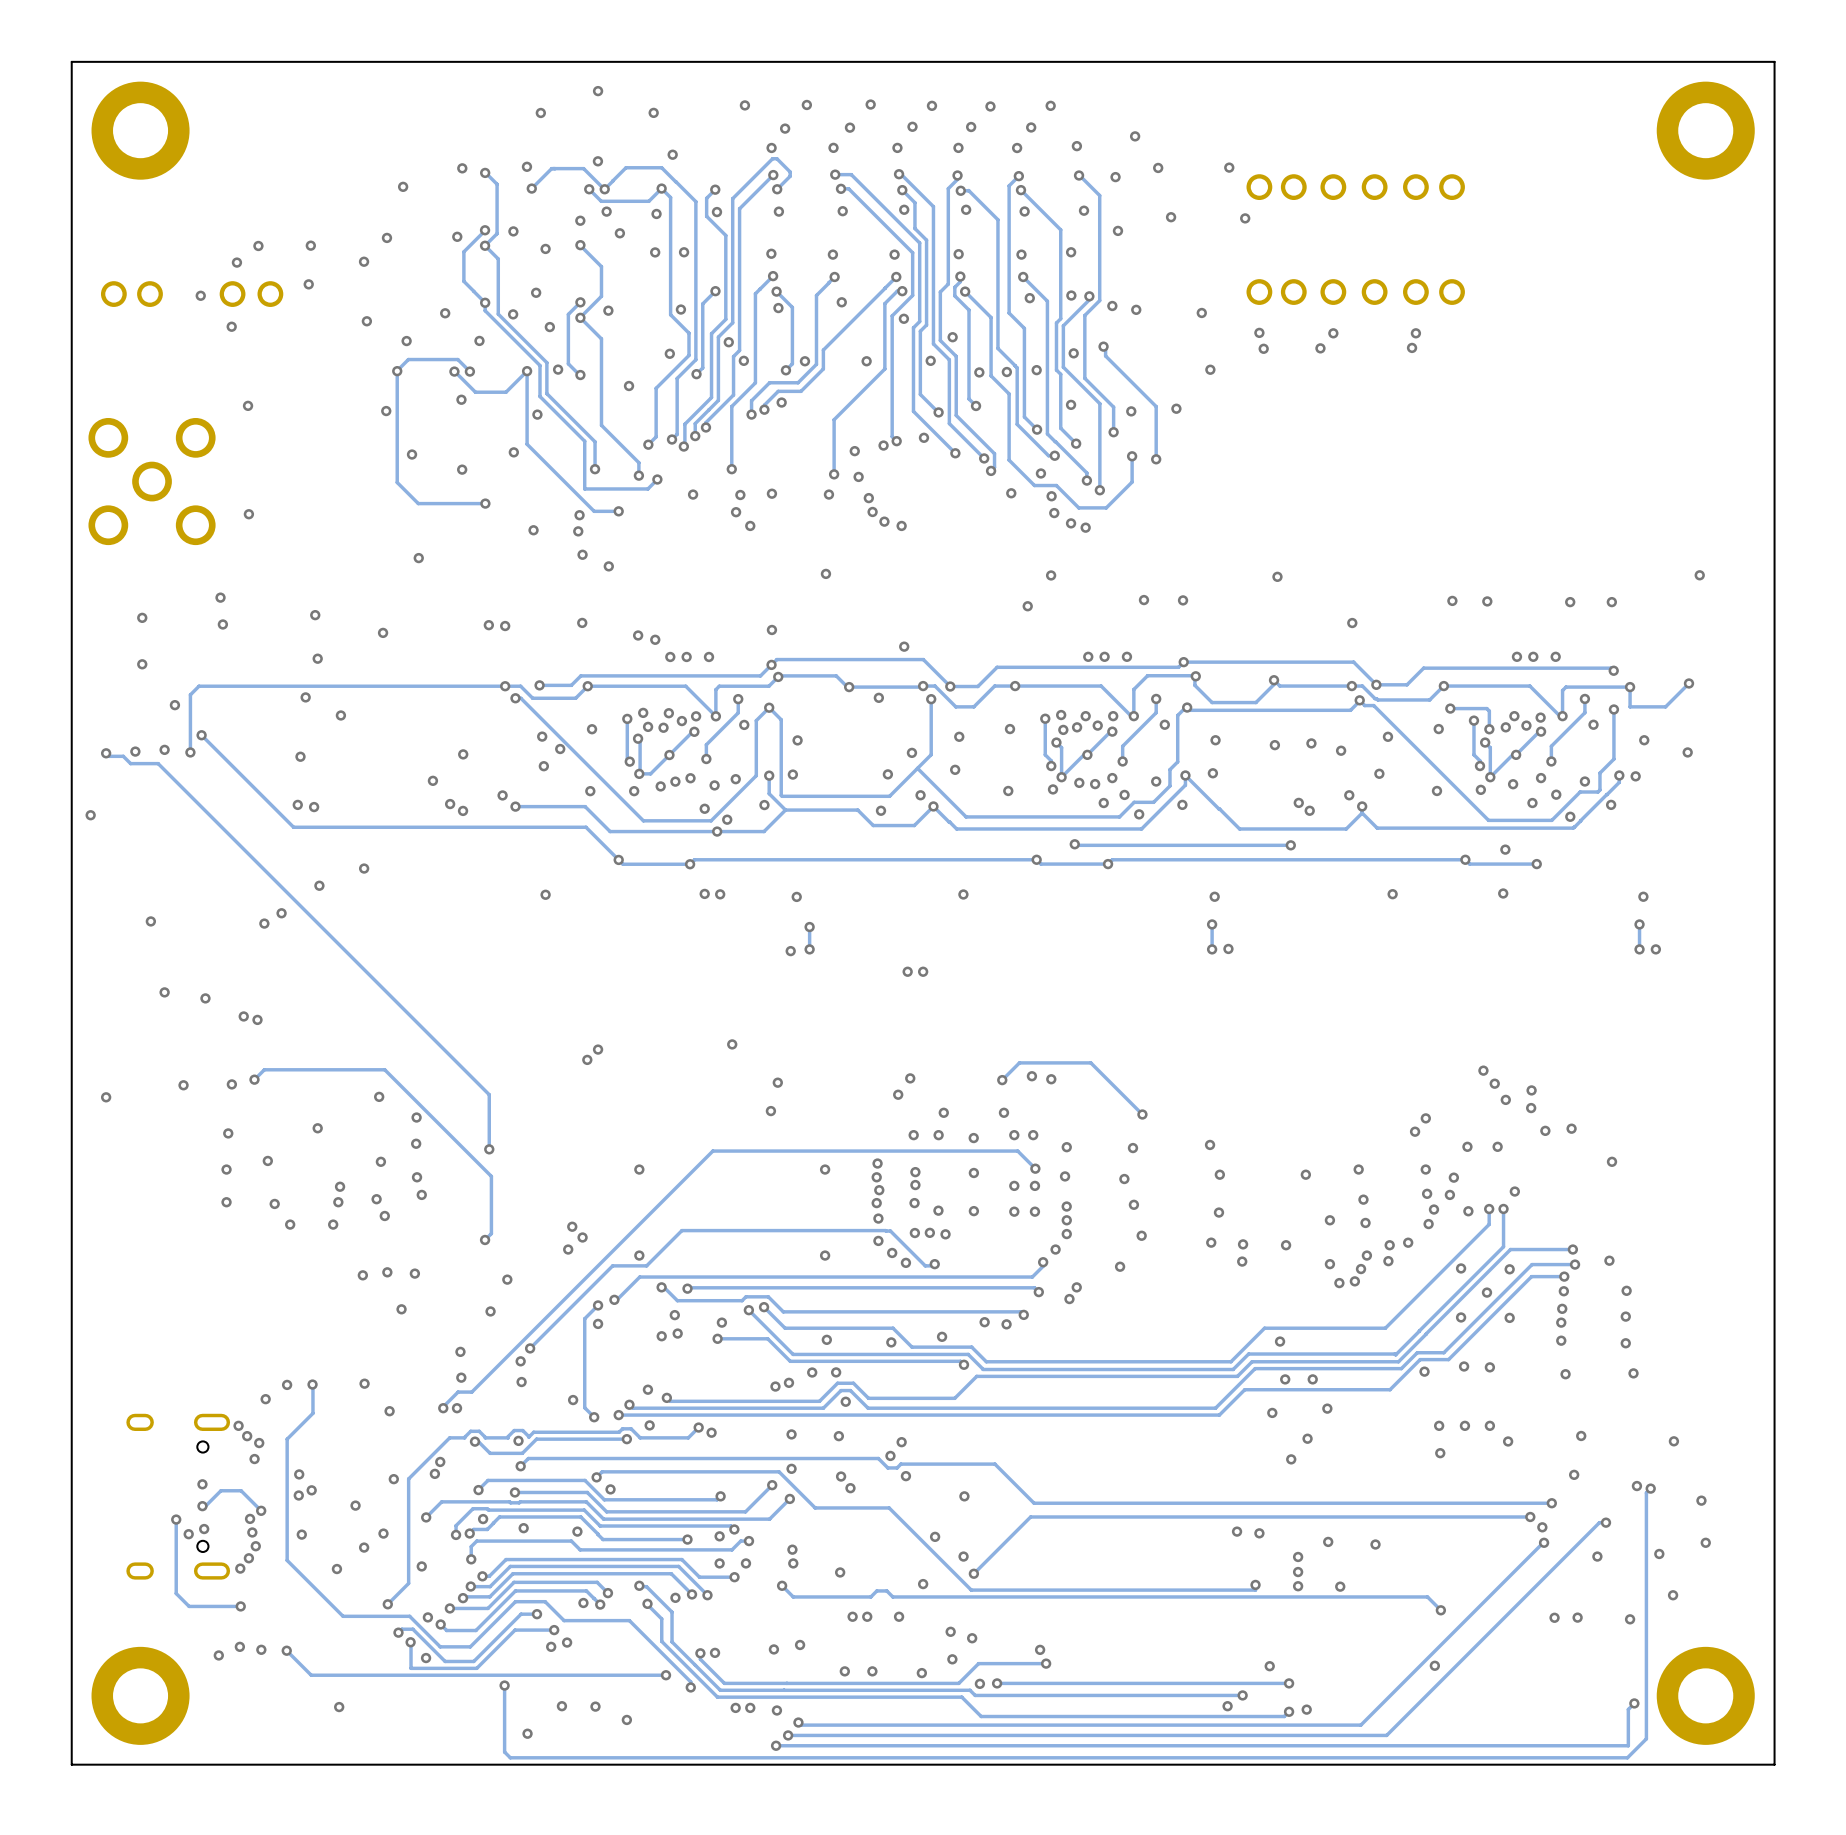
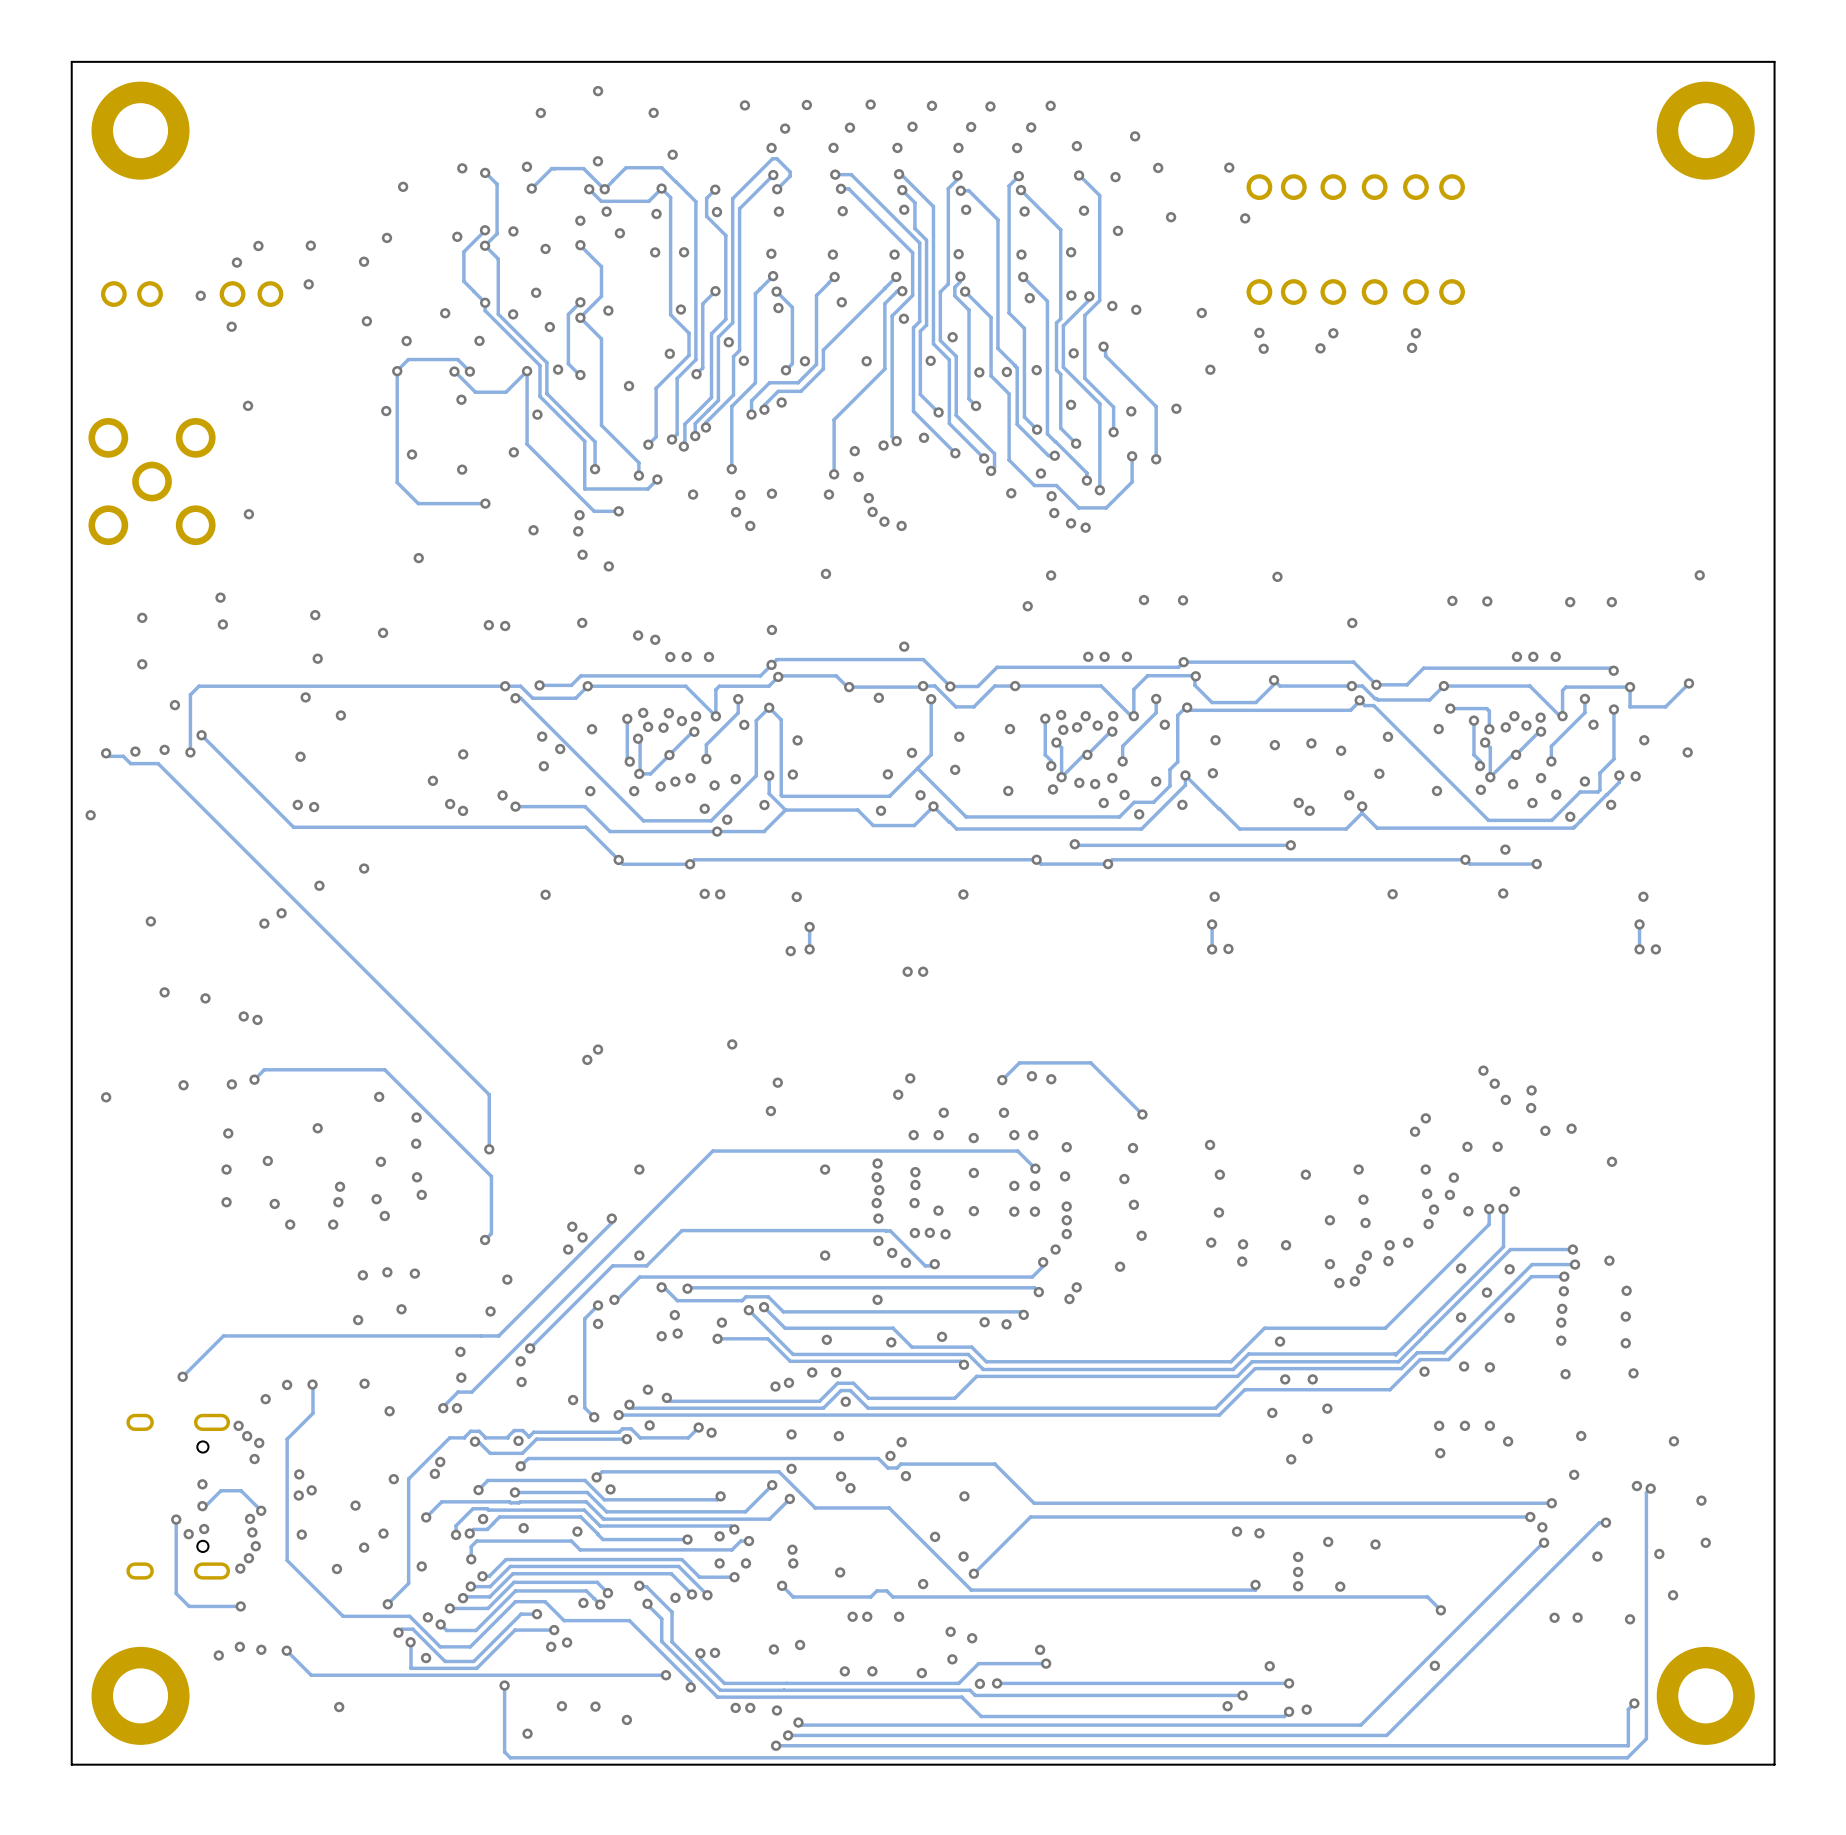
track: none -> (611, 1218) (611, 1222) (498, 1335) (223, 1335) (182, 1376)
via: none -> (611, 1218)
via: none -> (877, 1299)
via: none -> (358, 1320)
via: none -> (182, 1376)

